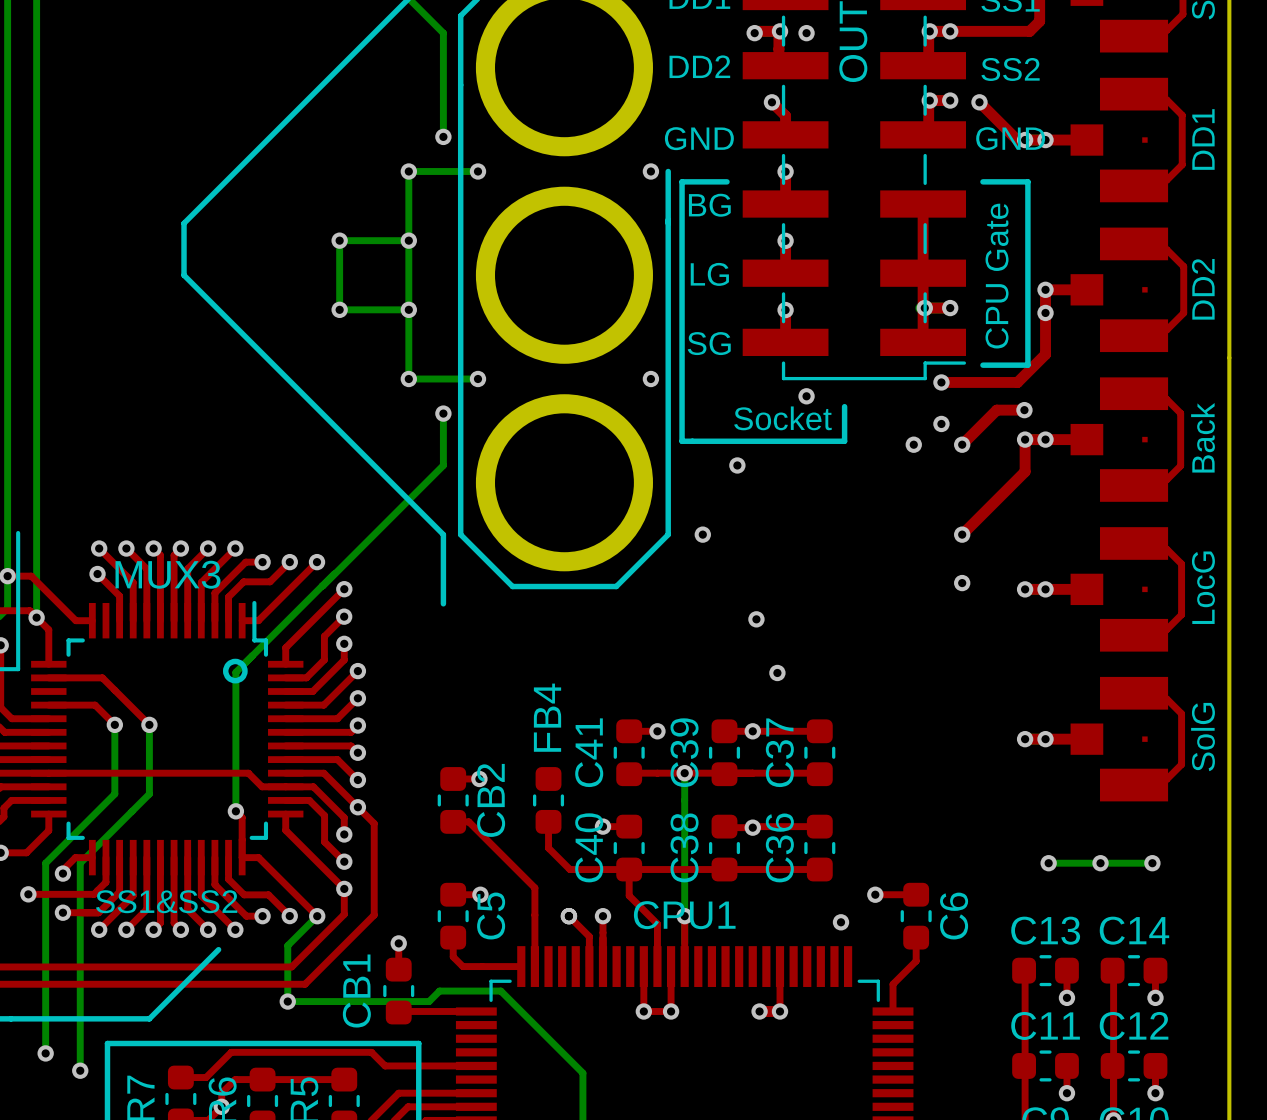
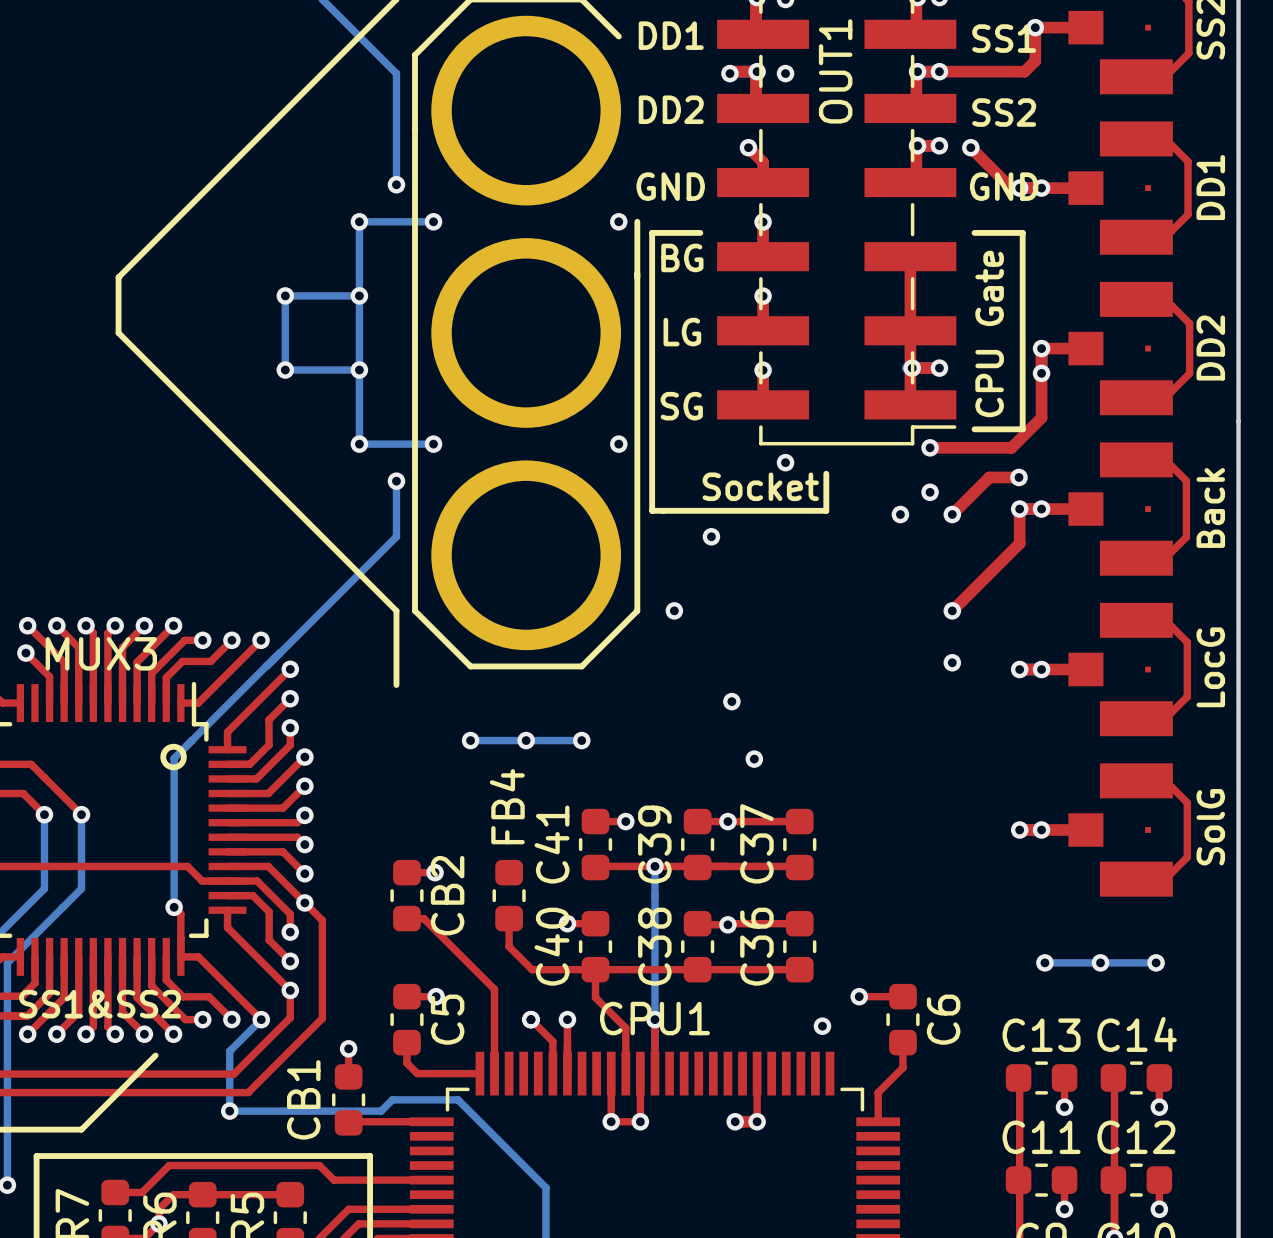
bottom track: none -> (470, 740) (581, 740)
via: none -> (470, 740)
via: none -> (526, 740)
via: none -> (581, 740)

